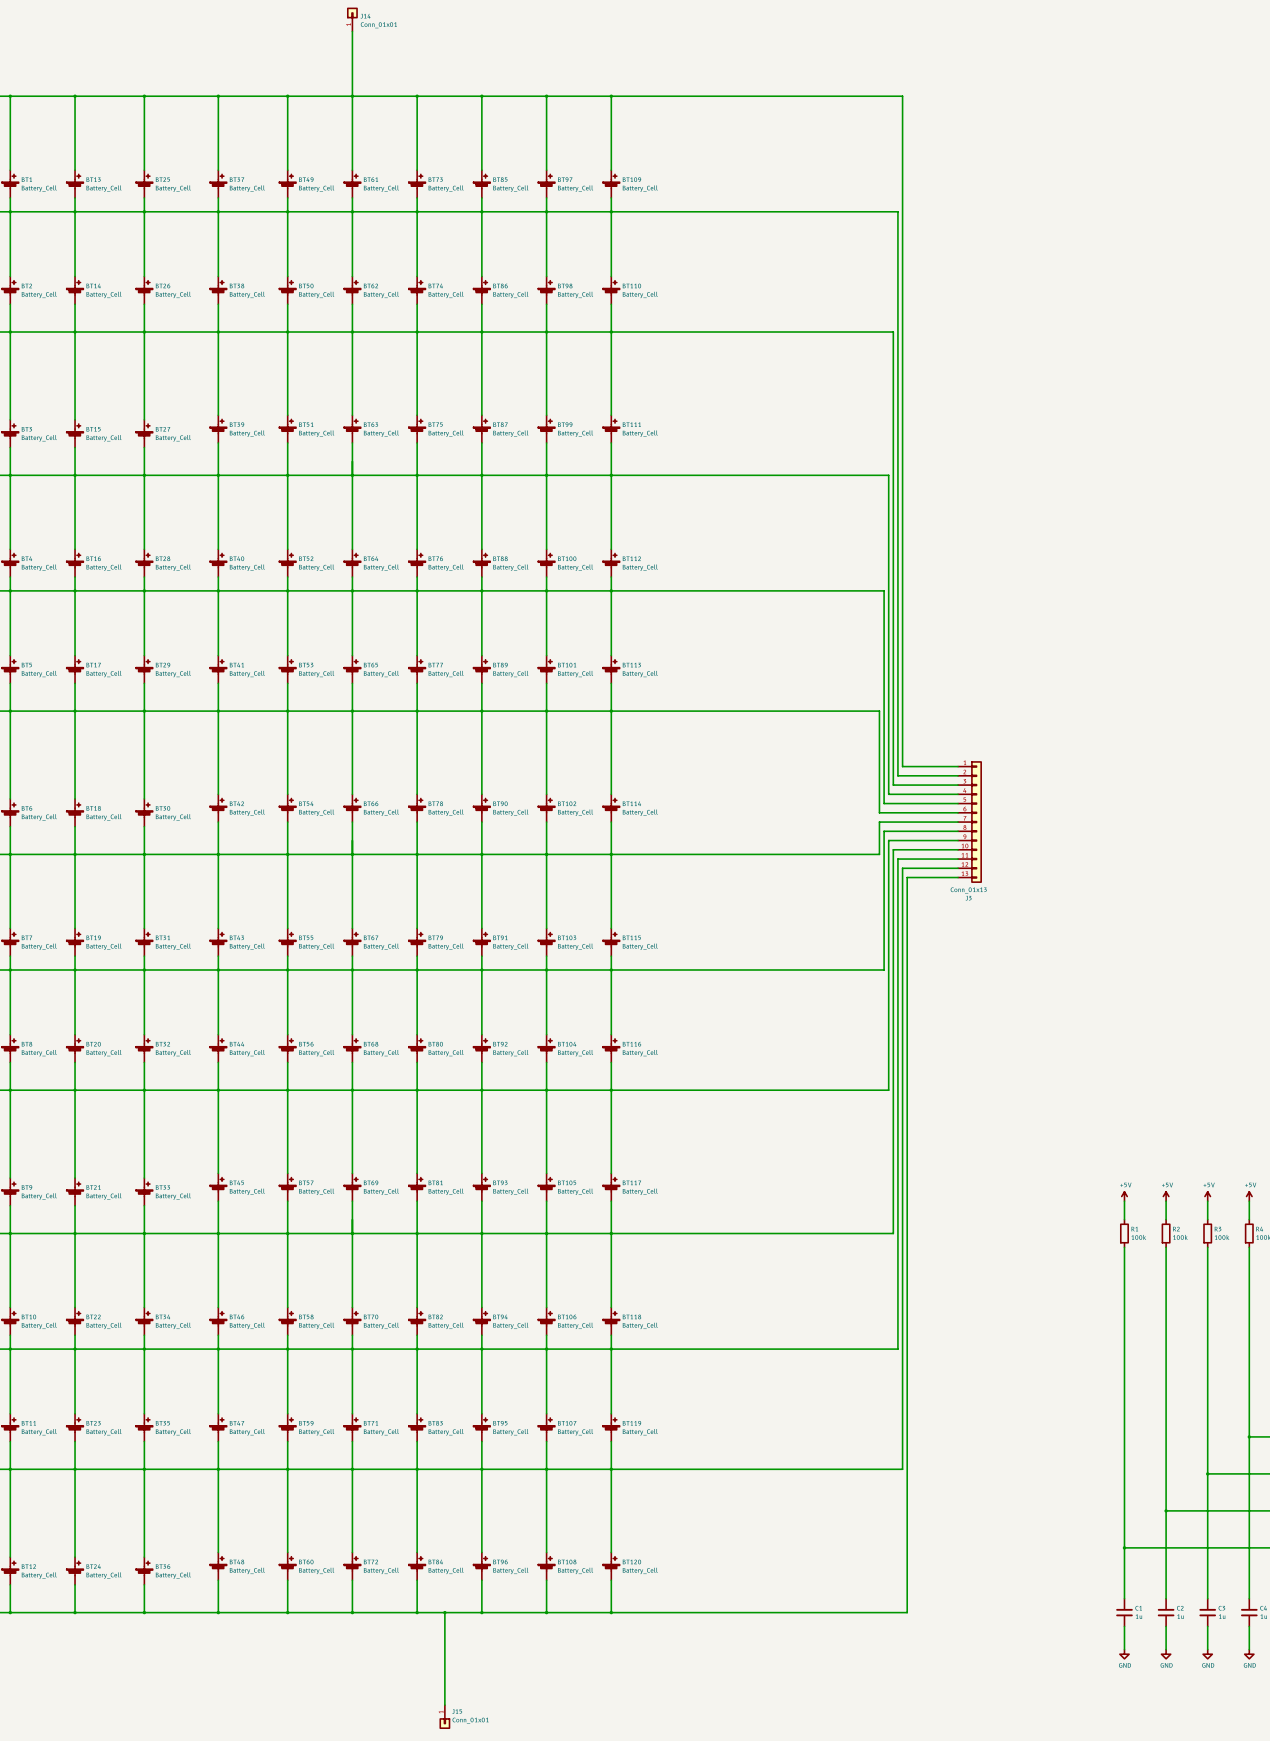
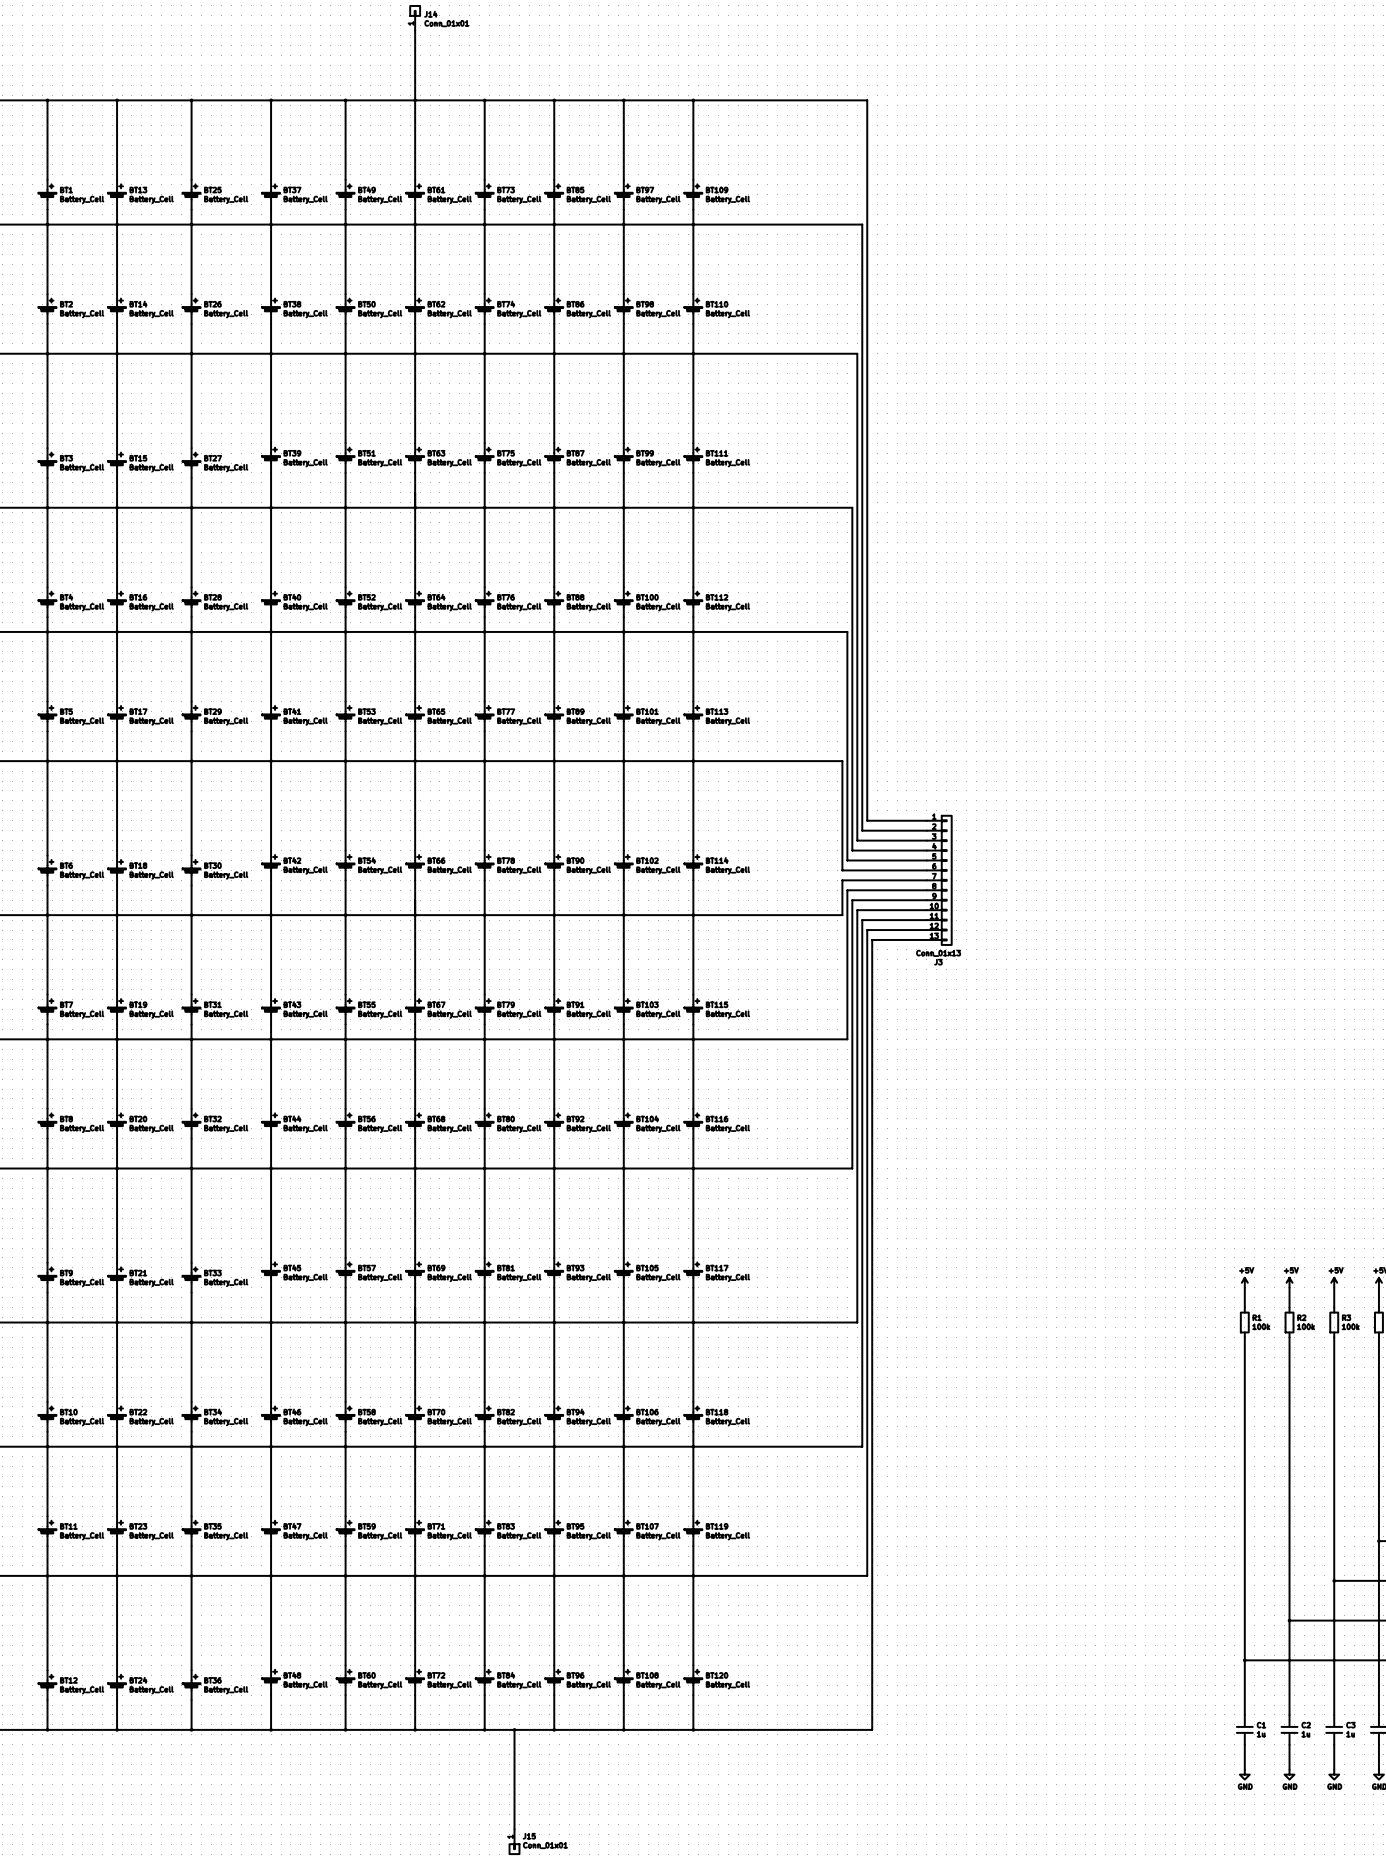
wire: (773, 96) (902, 96) (902, 766) (958, 766) -> (867, 100) (867, 820) (926, 820)
wire: (768, 211) (897, 211) (897, 775) (958, 775) -> (862, 224) (862, 830) (926, 830)
wire: (763, 332) (893, 332) (893, 785) (958, 785) -> (857, 353) (857, 840) (926, 840)
wire: (759, 475) (888, 475) (888, 794) (958, 794) -> (852, 507) (852, 850) (926, 850)
wire: (754, 590) (884, 590) (884, 803) (958, 803) -> (847, 631) (847, 860) (926, 860)
wire: (750, 711) (879, 711) (879, 812) (958, 812) -> (842, 761) (842, 870) (926, 870)
wire: (958, 822) (879, 822) (879, 854) (750, 854) -> (926, 880) (842, 880) (842, 915)
part position: (969, 822) -> (939, 880)
wire: (958, 831) (884, 831) (884, 969) (754, 969) -> (926, 890) (847, 890) (847, 1039)
wire: (958, 840) (888, 840) (888, 1090) (759, 1090) -> (926, 900) (852, 900) (852, 1168)
wire: (958, 849) (893, 849) (893, 1233) (763, 1233) -> (926, 910) (857, 910) (857, 1322)
wire: (958, 859) (897, 859) (897, 1349) (768, 1349) -> (926, 920) (862, 920) (862, 1446)
wire: (958, 868) (902, 868) (902, 1469) (773, 1469) -> (926, 930) (867, 930) (867, 1575)
wire: (958, 877) (907, 877) (907, 1612) (777, 1612) -> (926, 939) (872, 939) (872, 1729)

